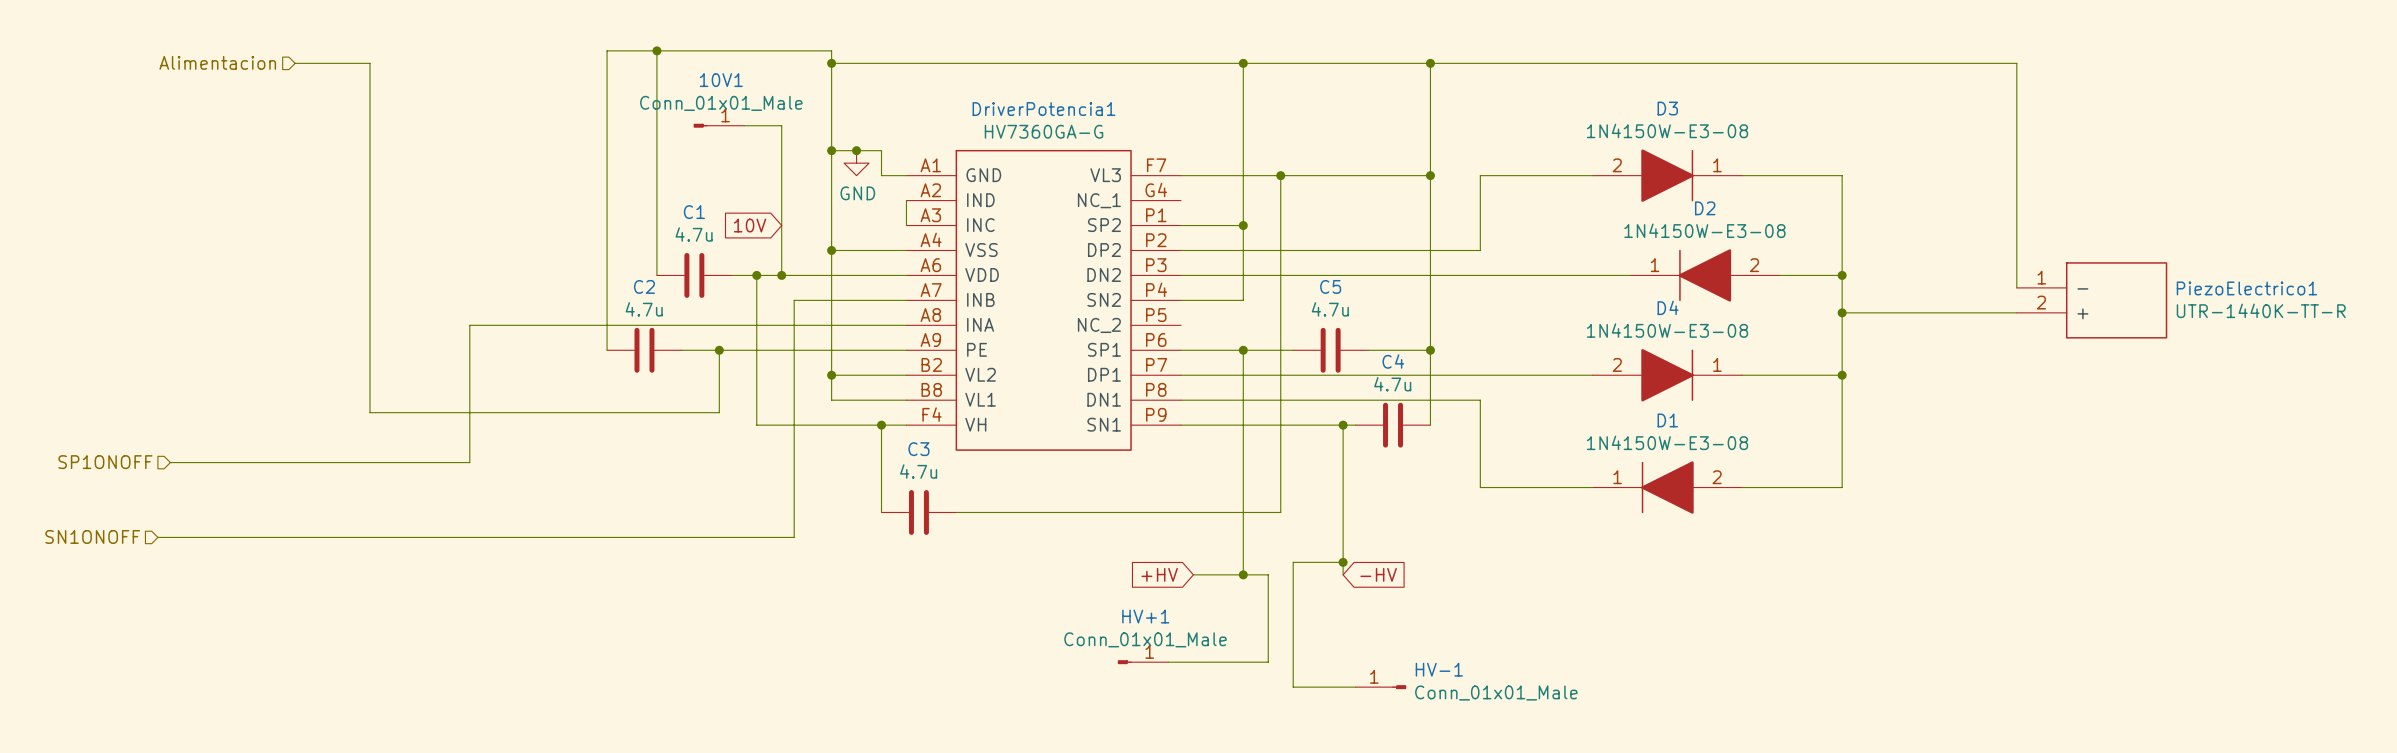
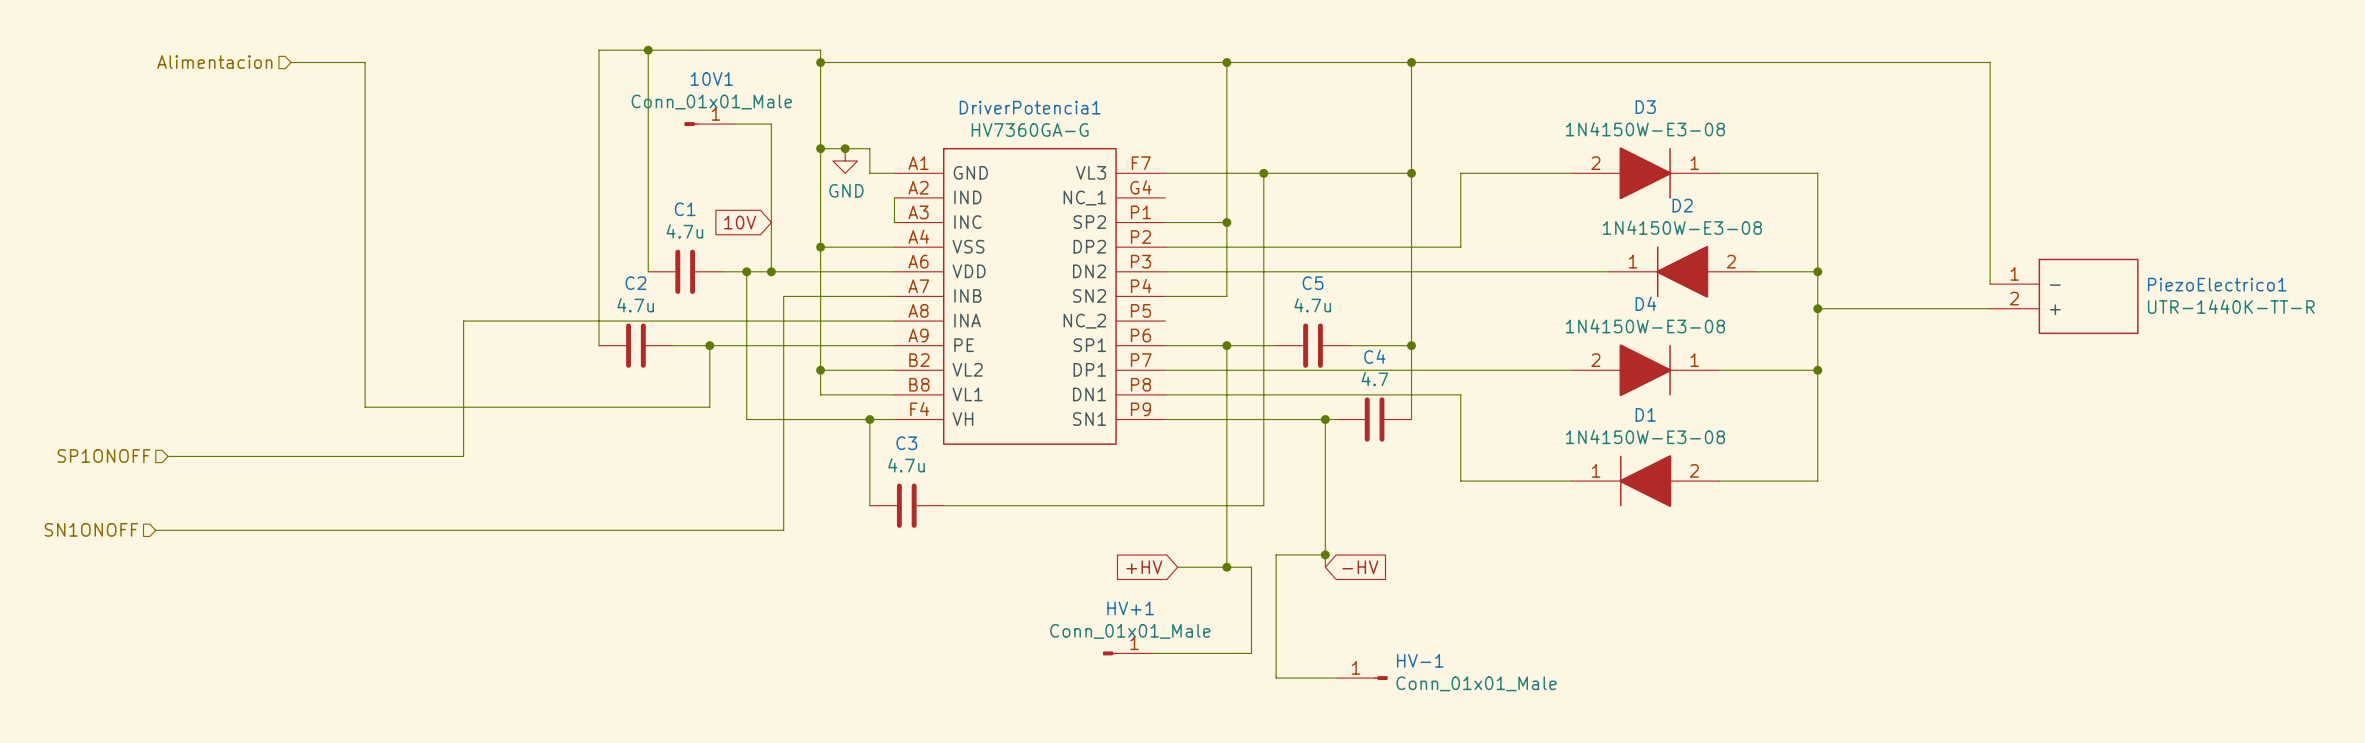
C4 value: 4.7u (1392, 384) -> 4.7 (1374, 379)

